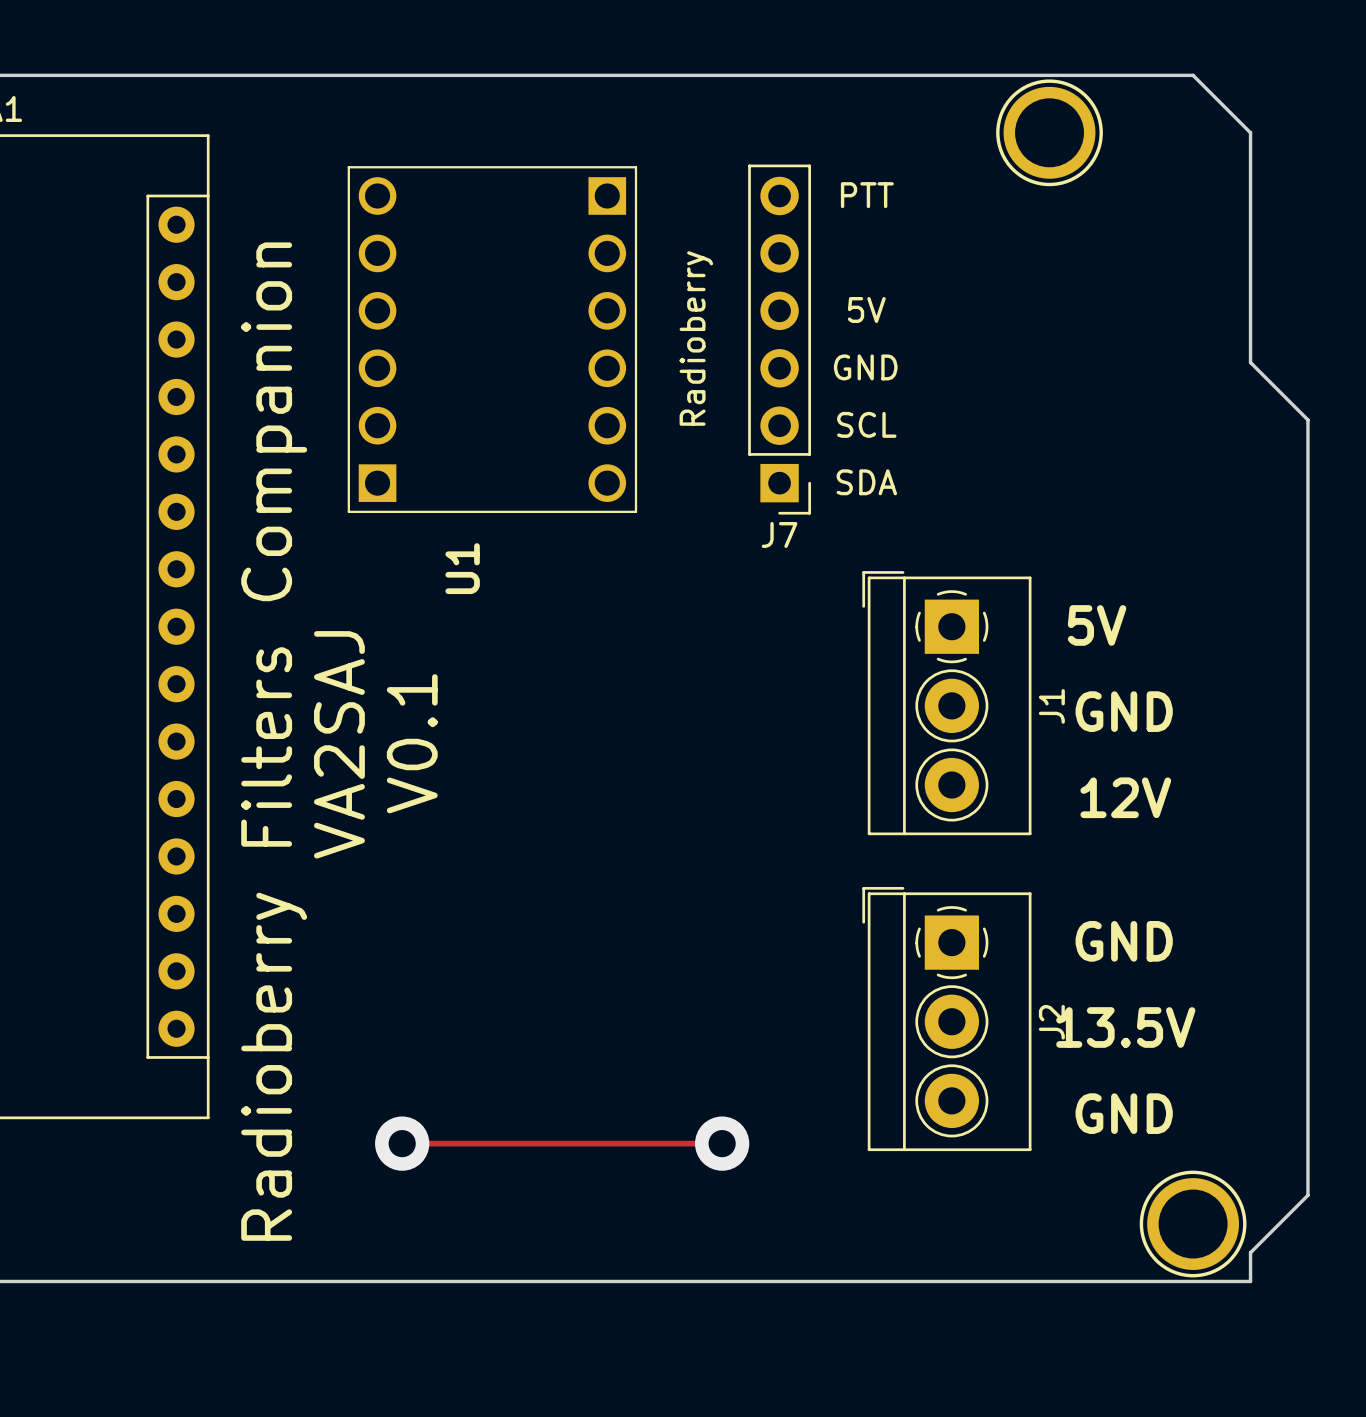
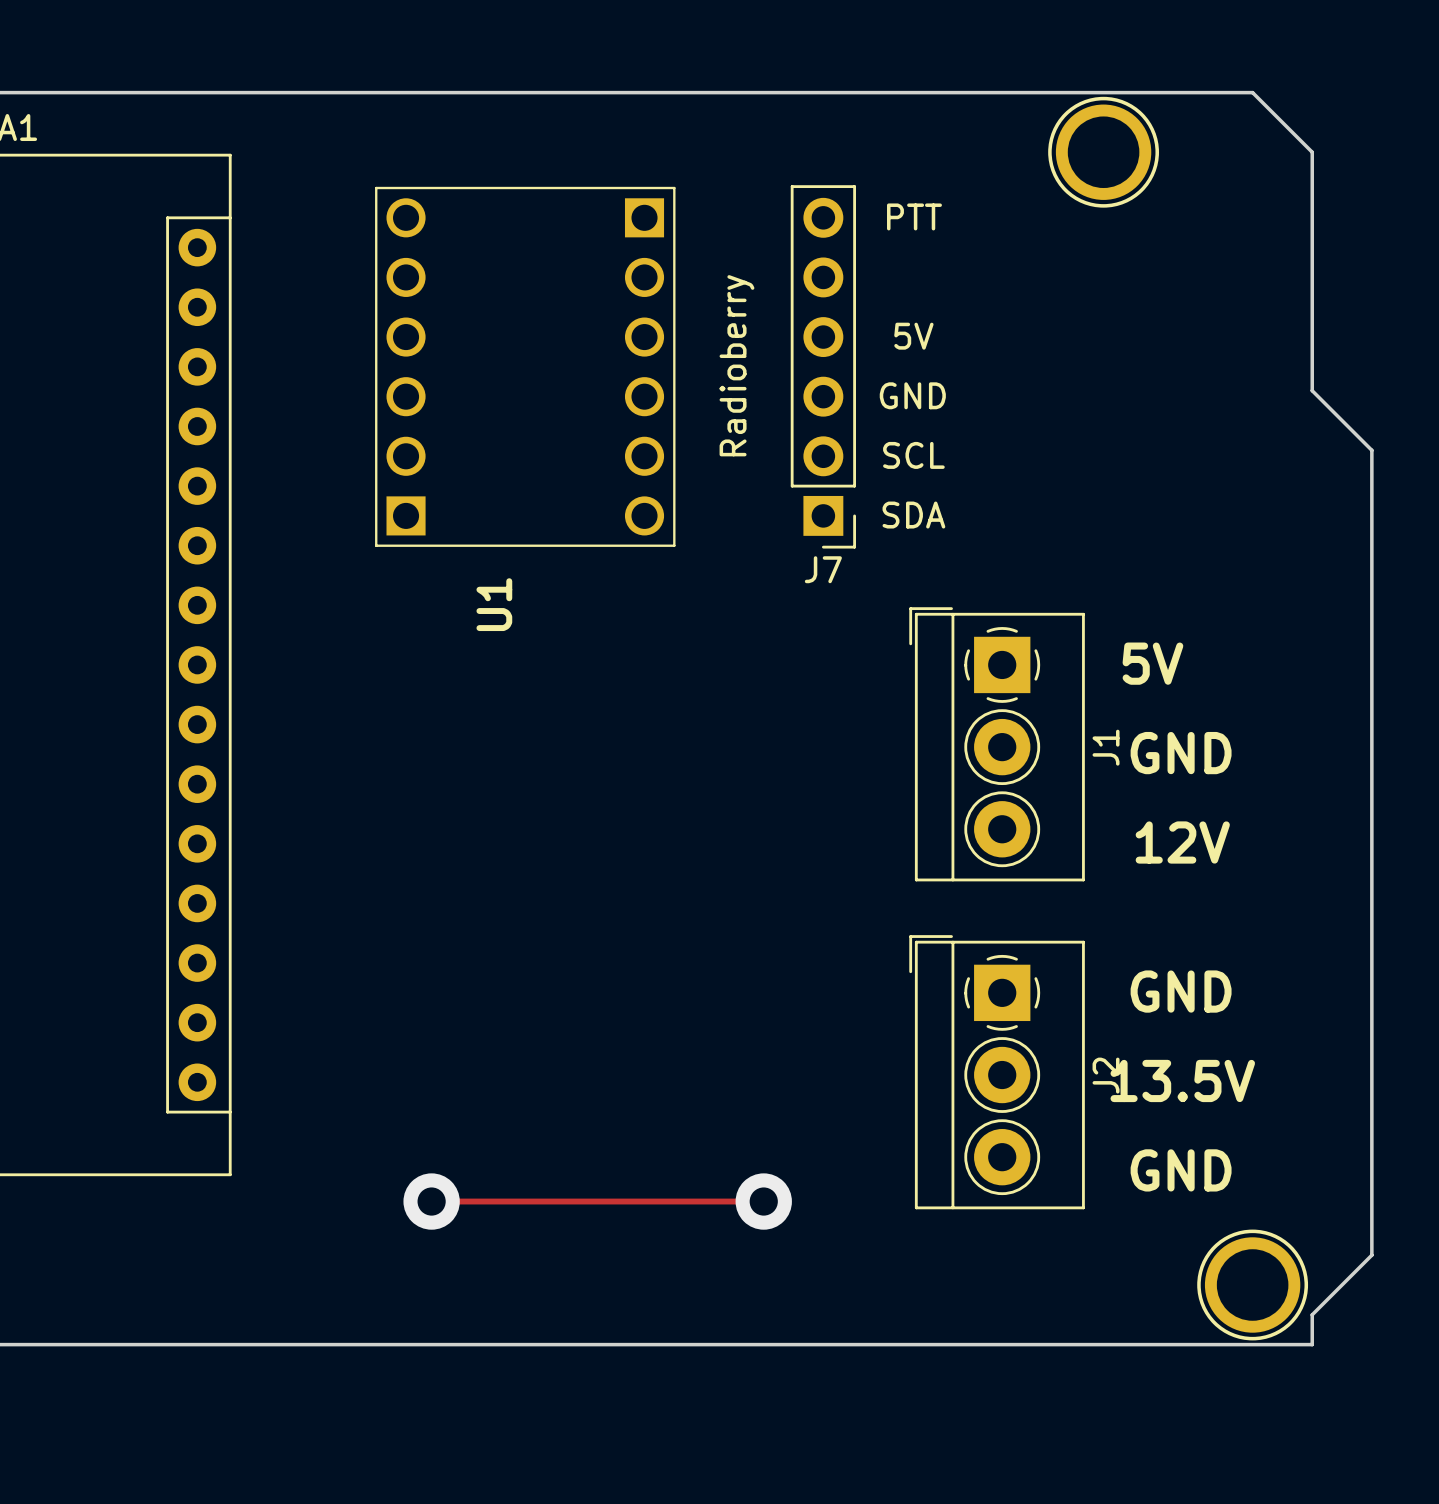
text: Radioberry Filters Companion (274, 741) -> none
text: V0.1 (412, 743) -> none
text: VA2SAJ (339, 744) -> none

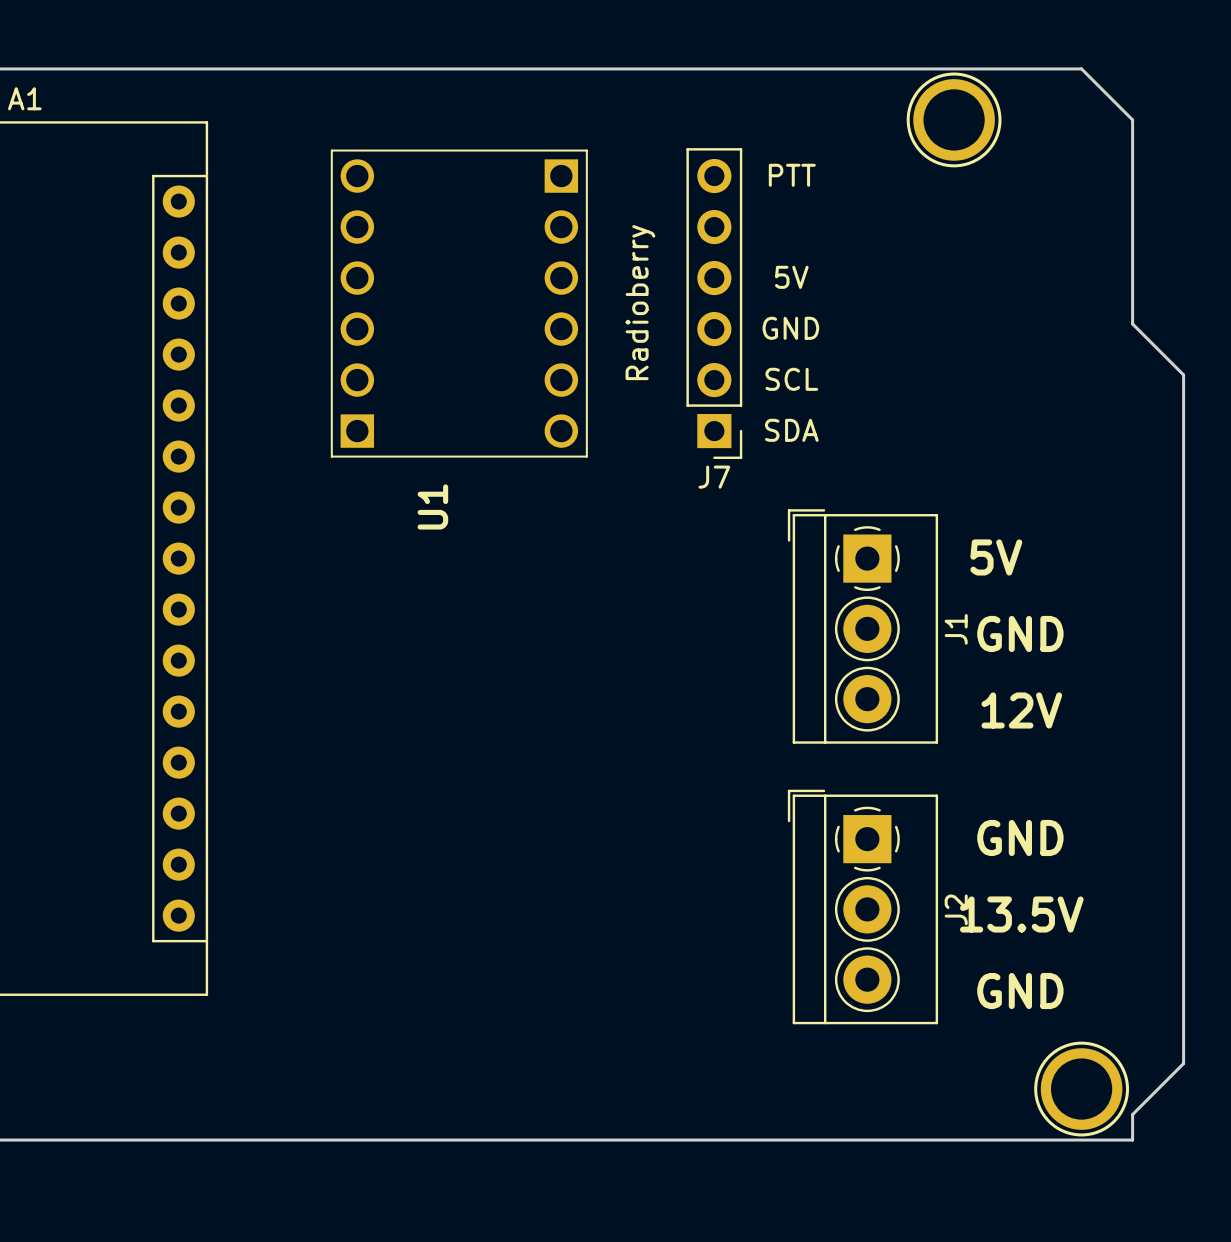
track: (431, 1201) (763, 1201) -> none
via: (431, 1201) -> none
via: (763, 1201) -> none

